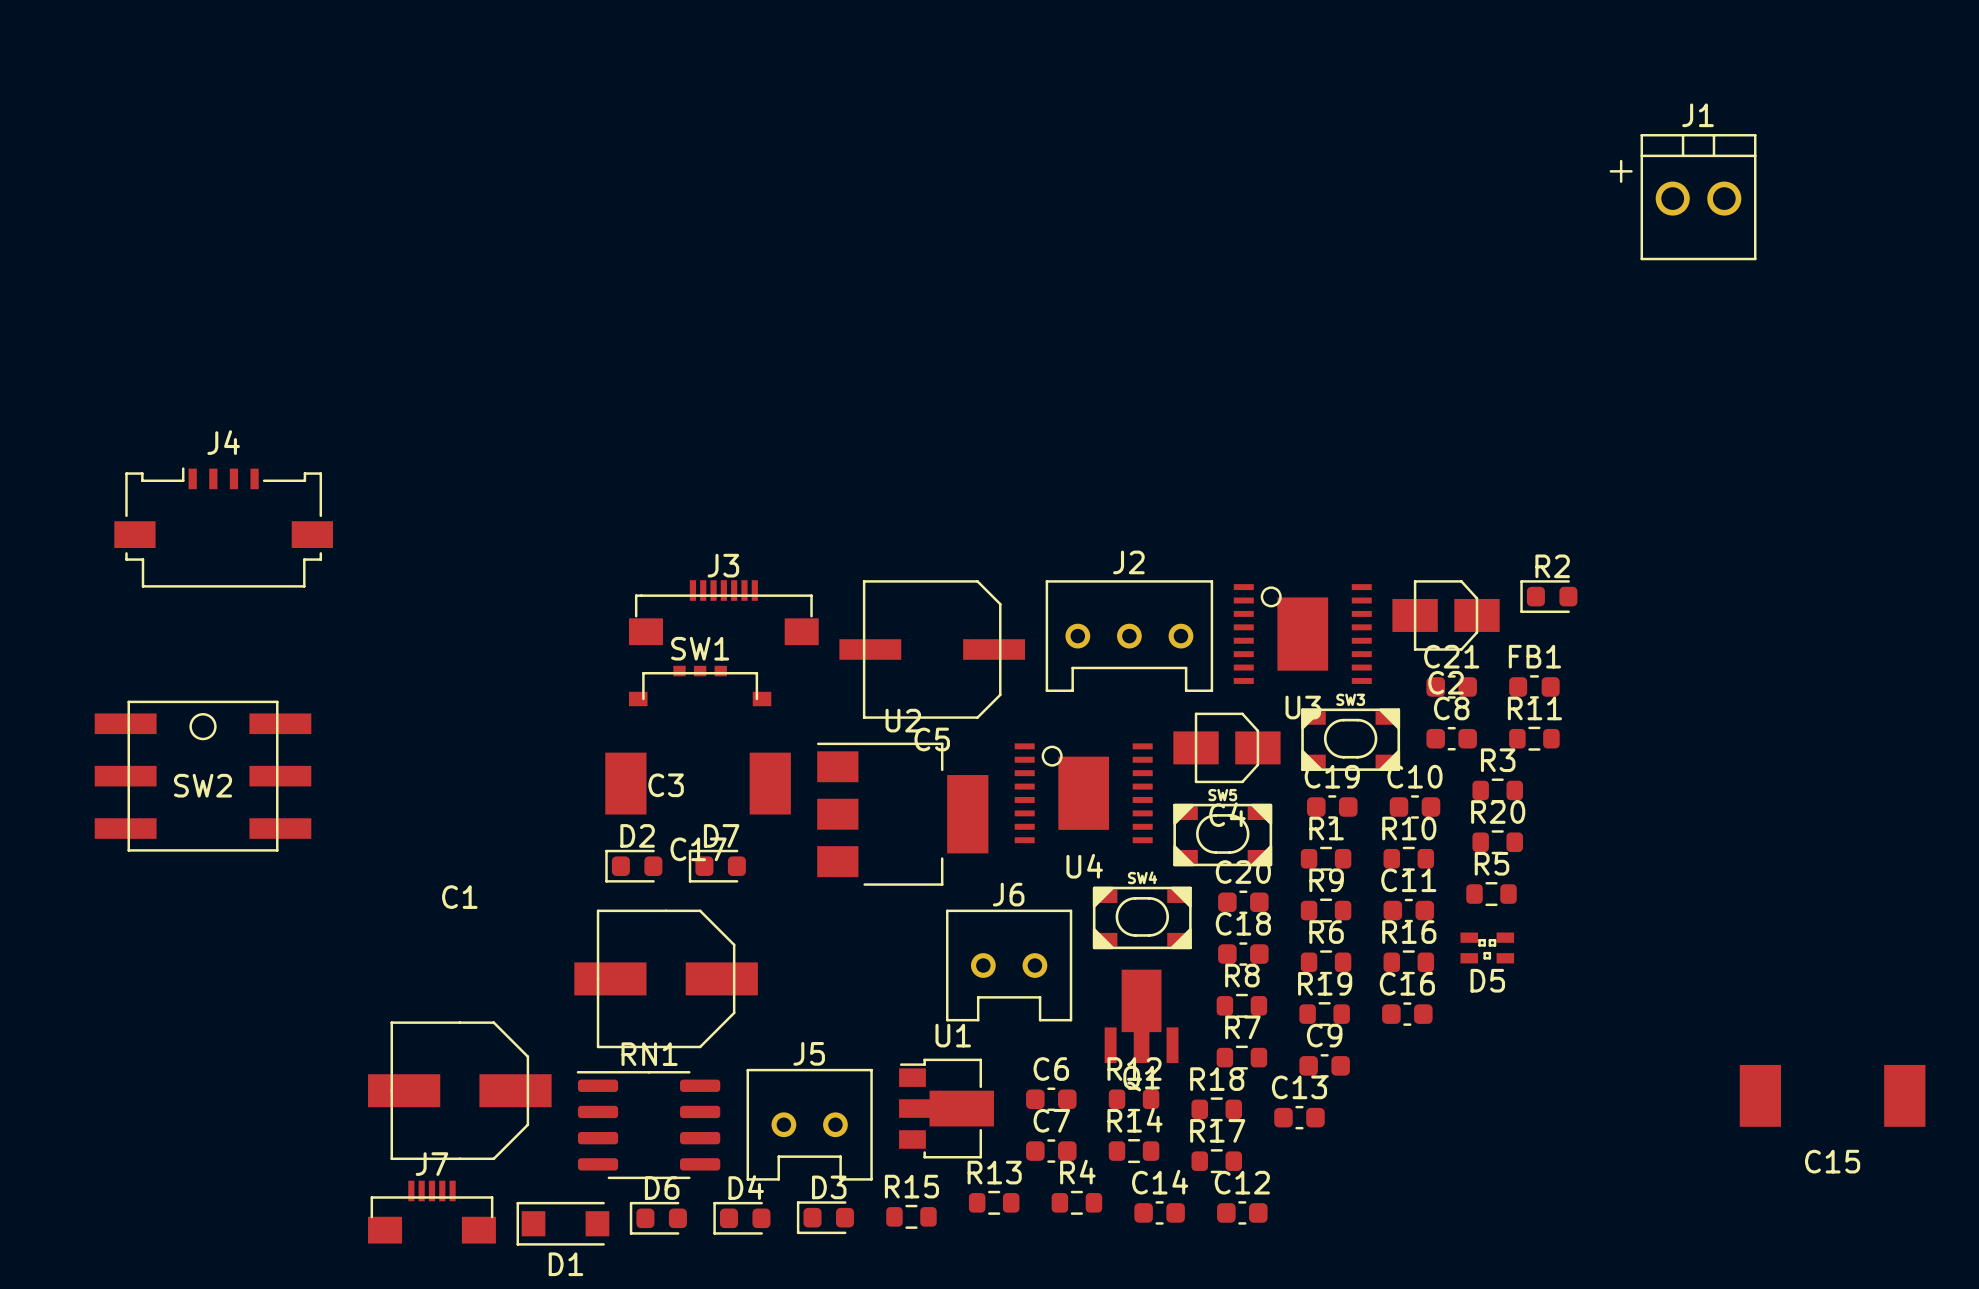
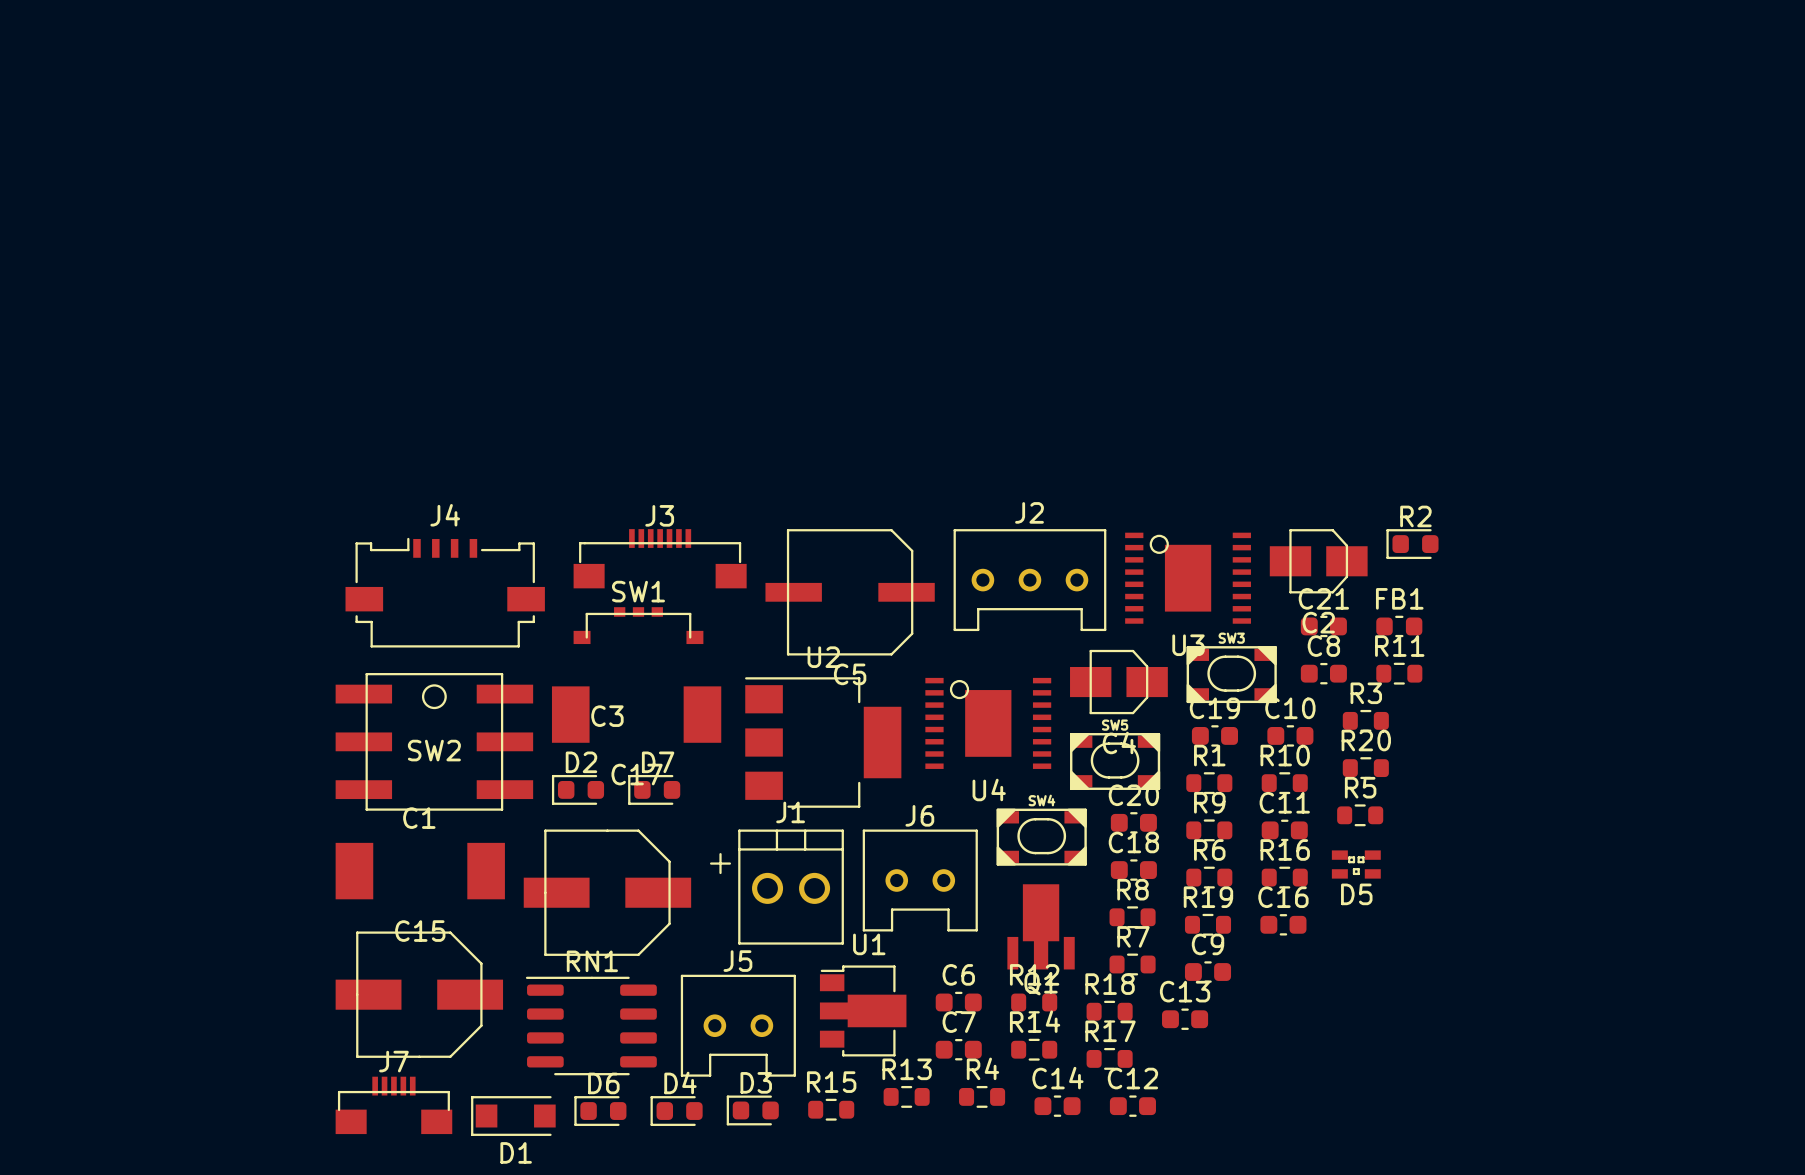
J1 position: (1683, 197) -> (776, 887)
J4 position: (223, 527) -> (445, 592)
SW2 position: (203, 776) -> (434, 741)
C15 position: (1832, 1095) -> (420, 871)

